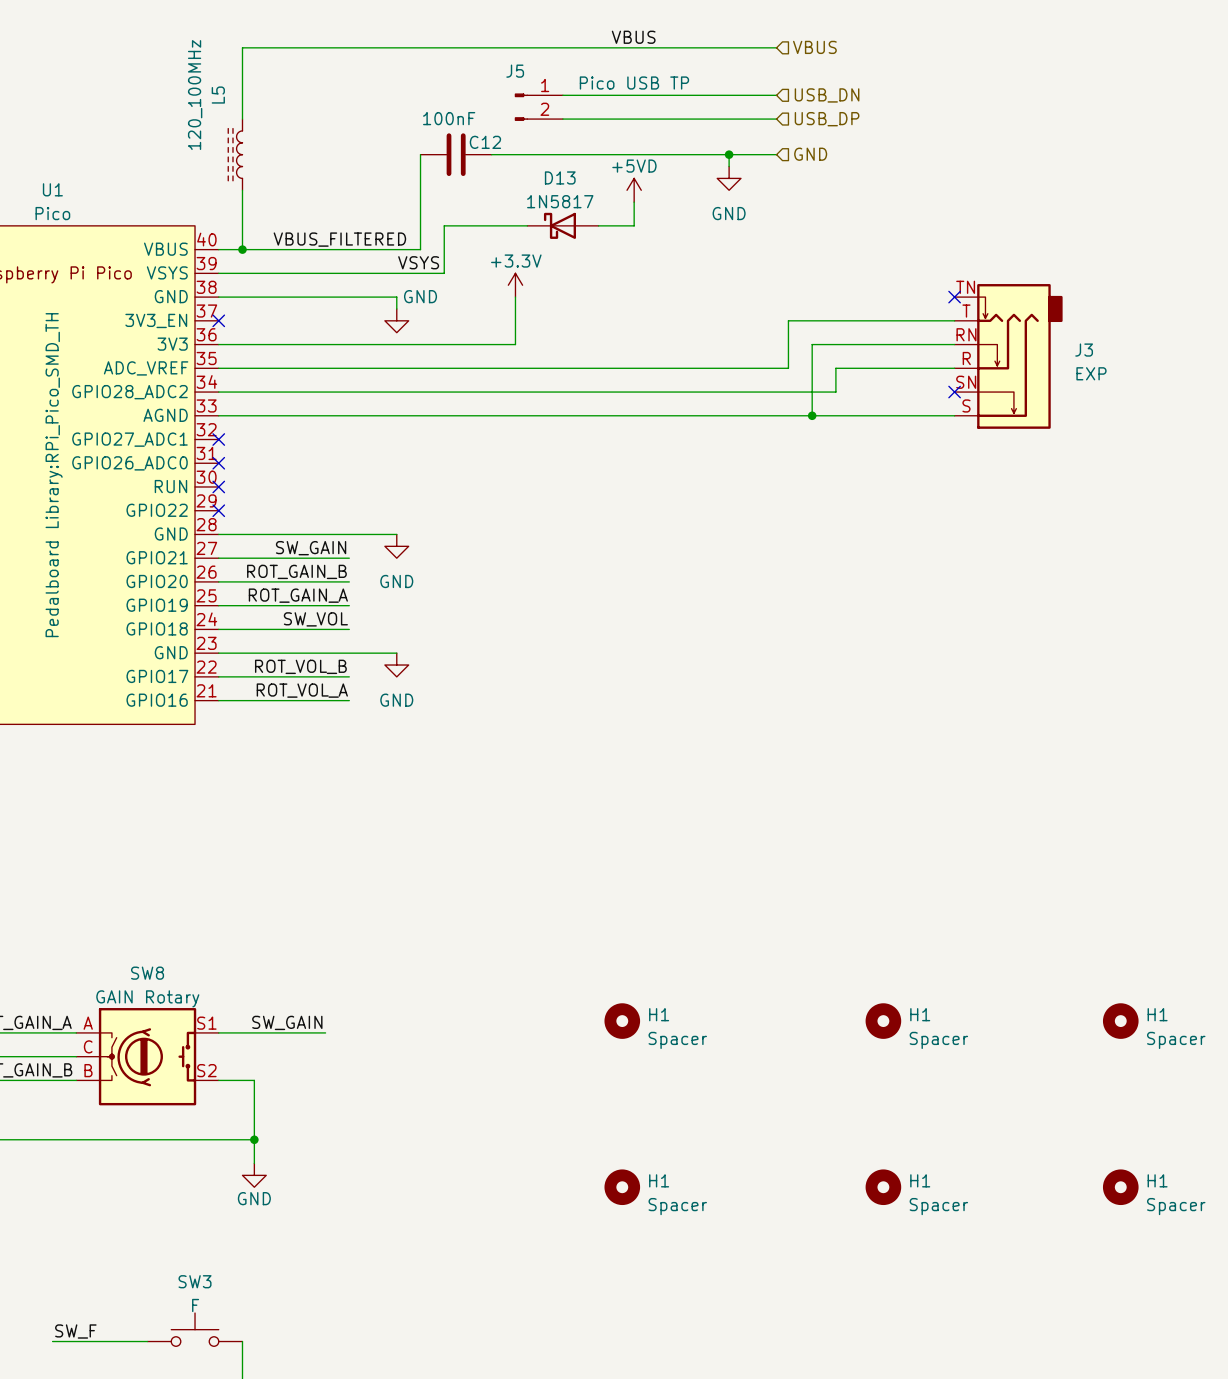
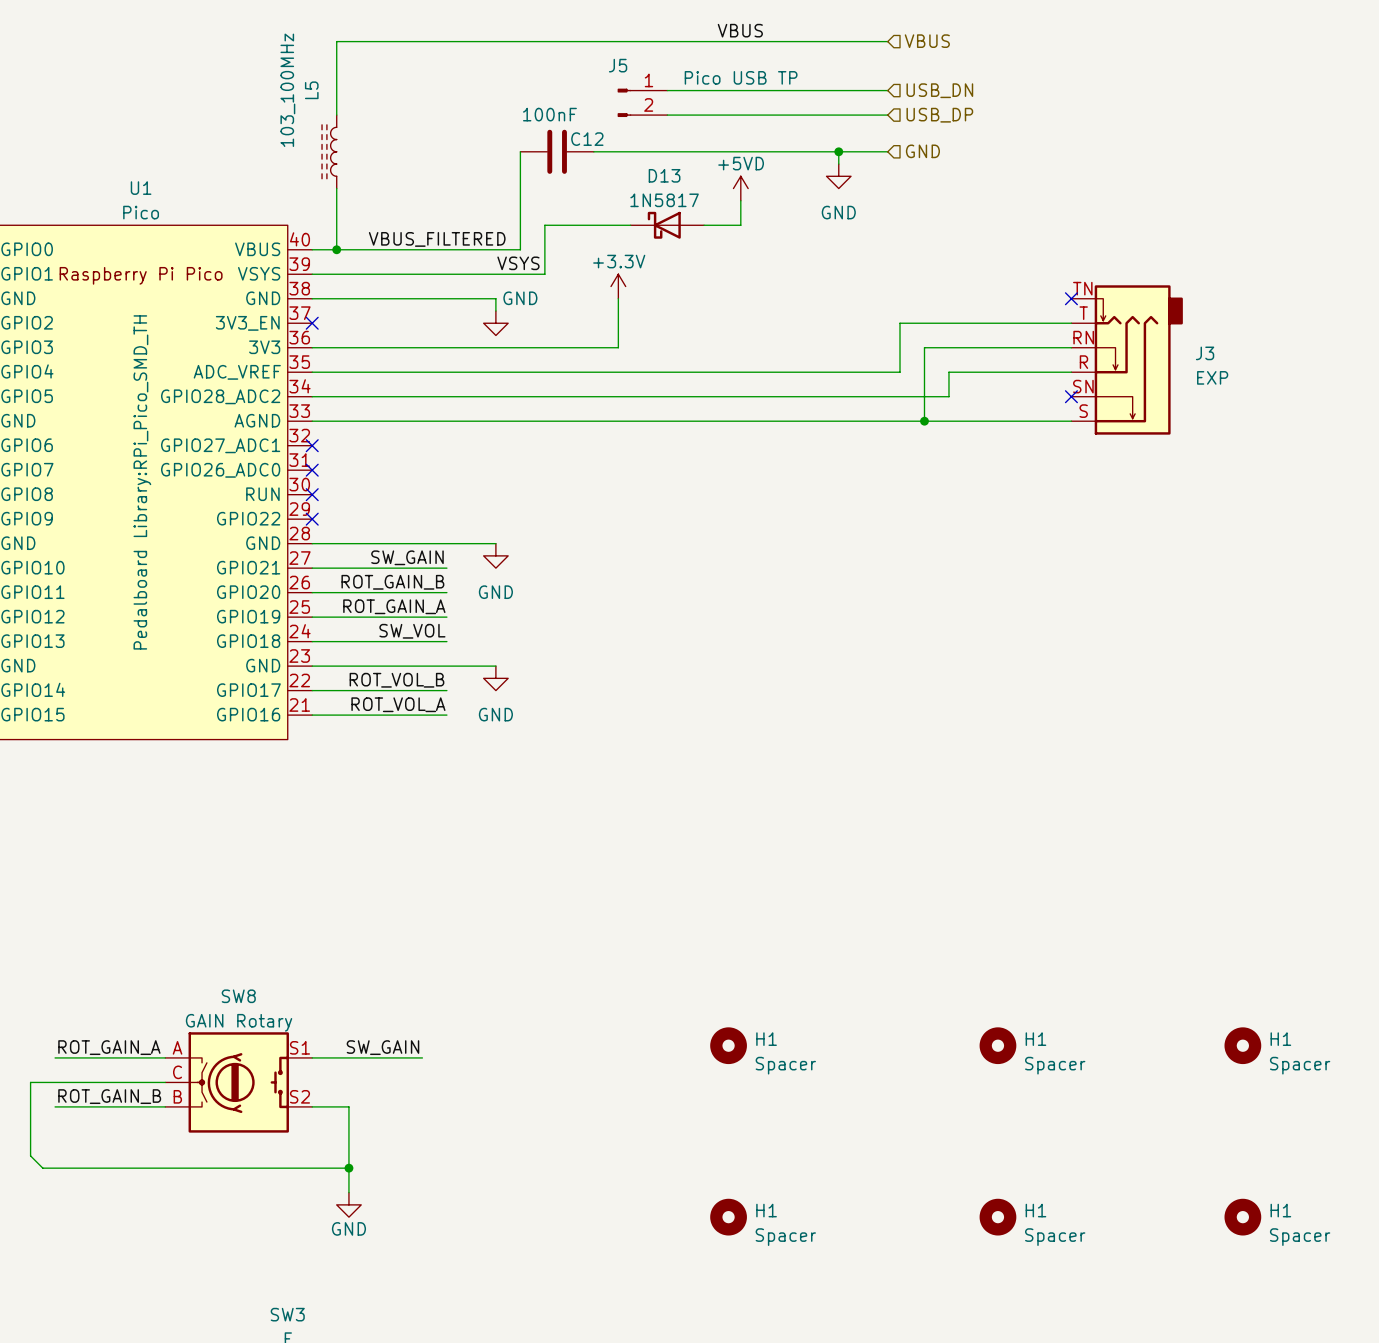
L5 value: 120_100MHz (195, 95) -> 103_100MHz (287, 90)

